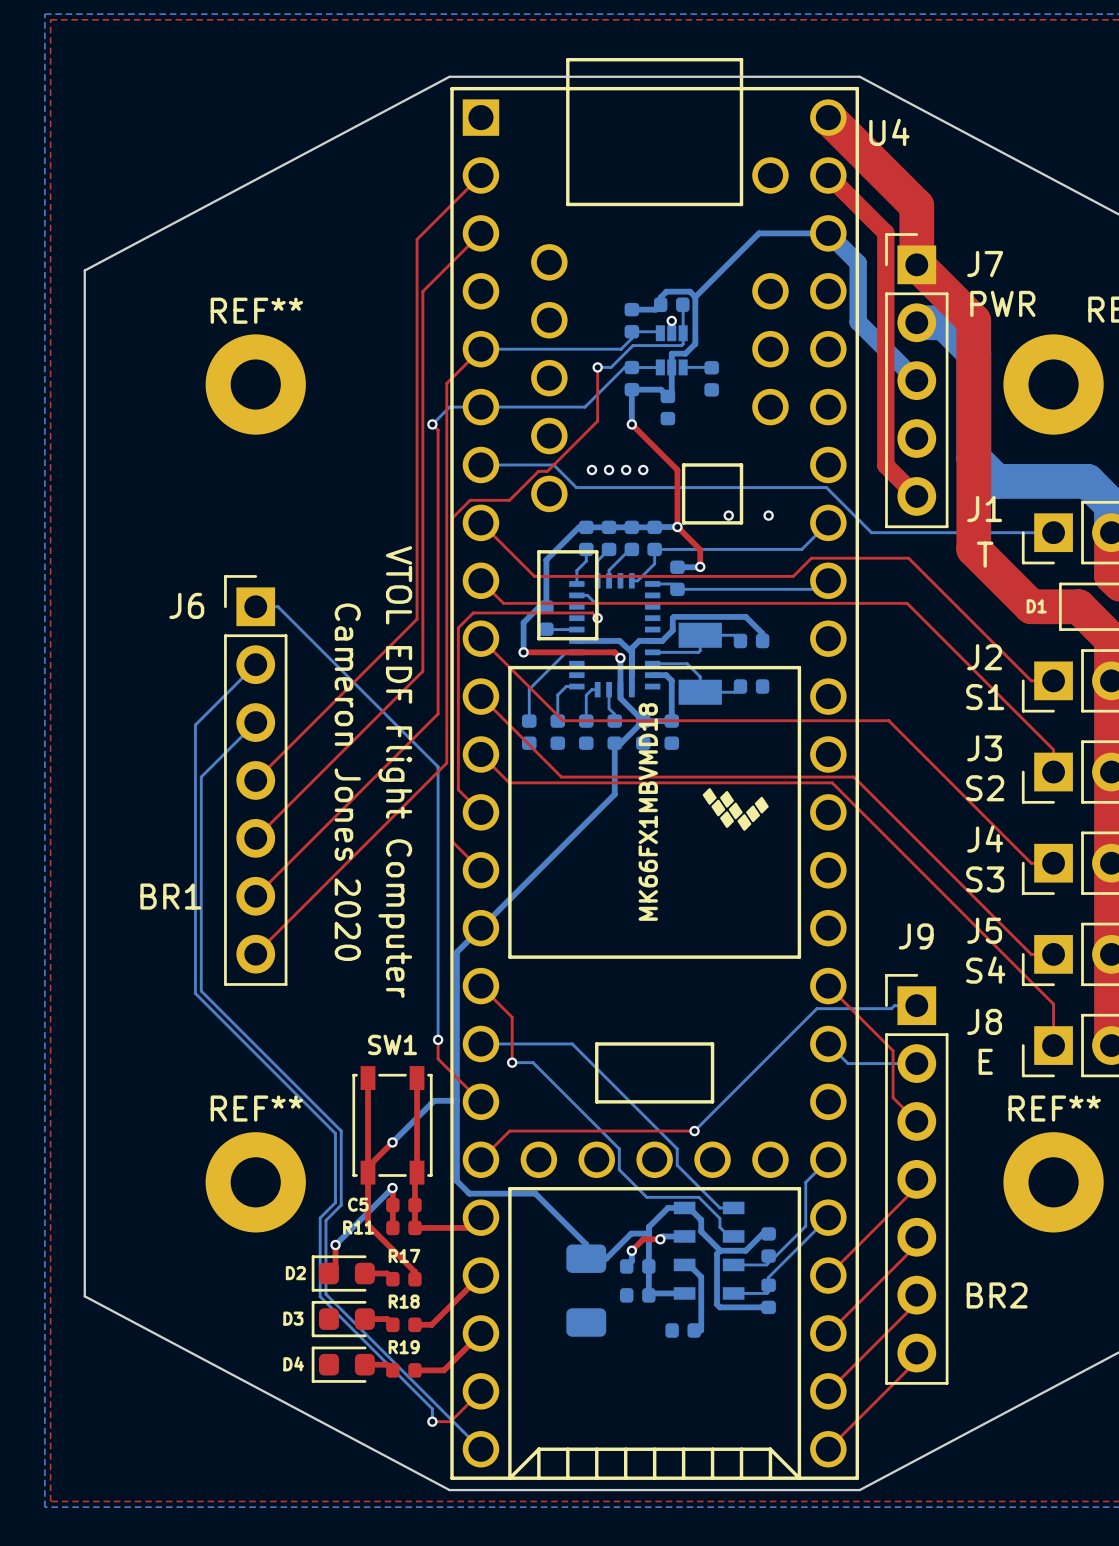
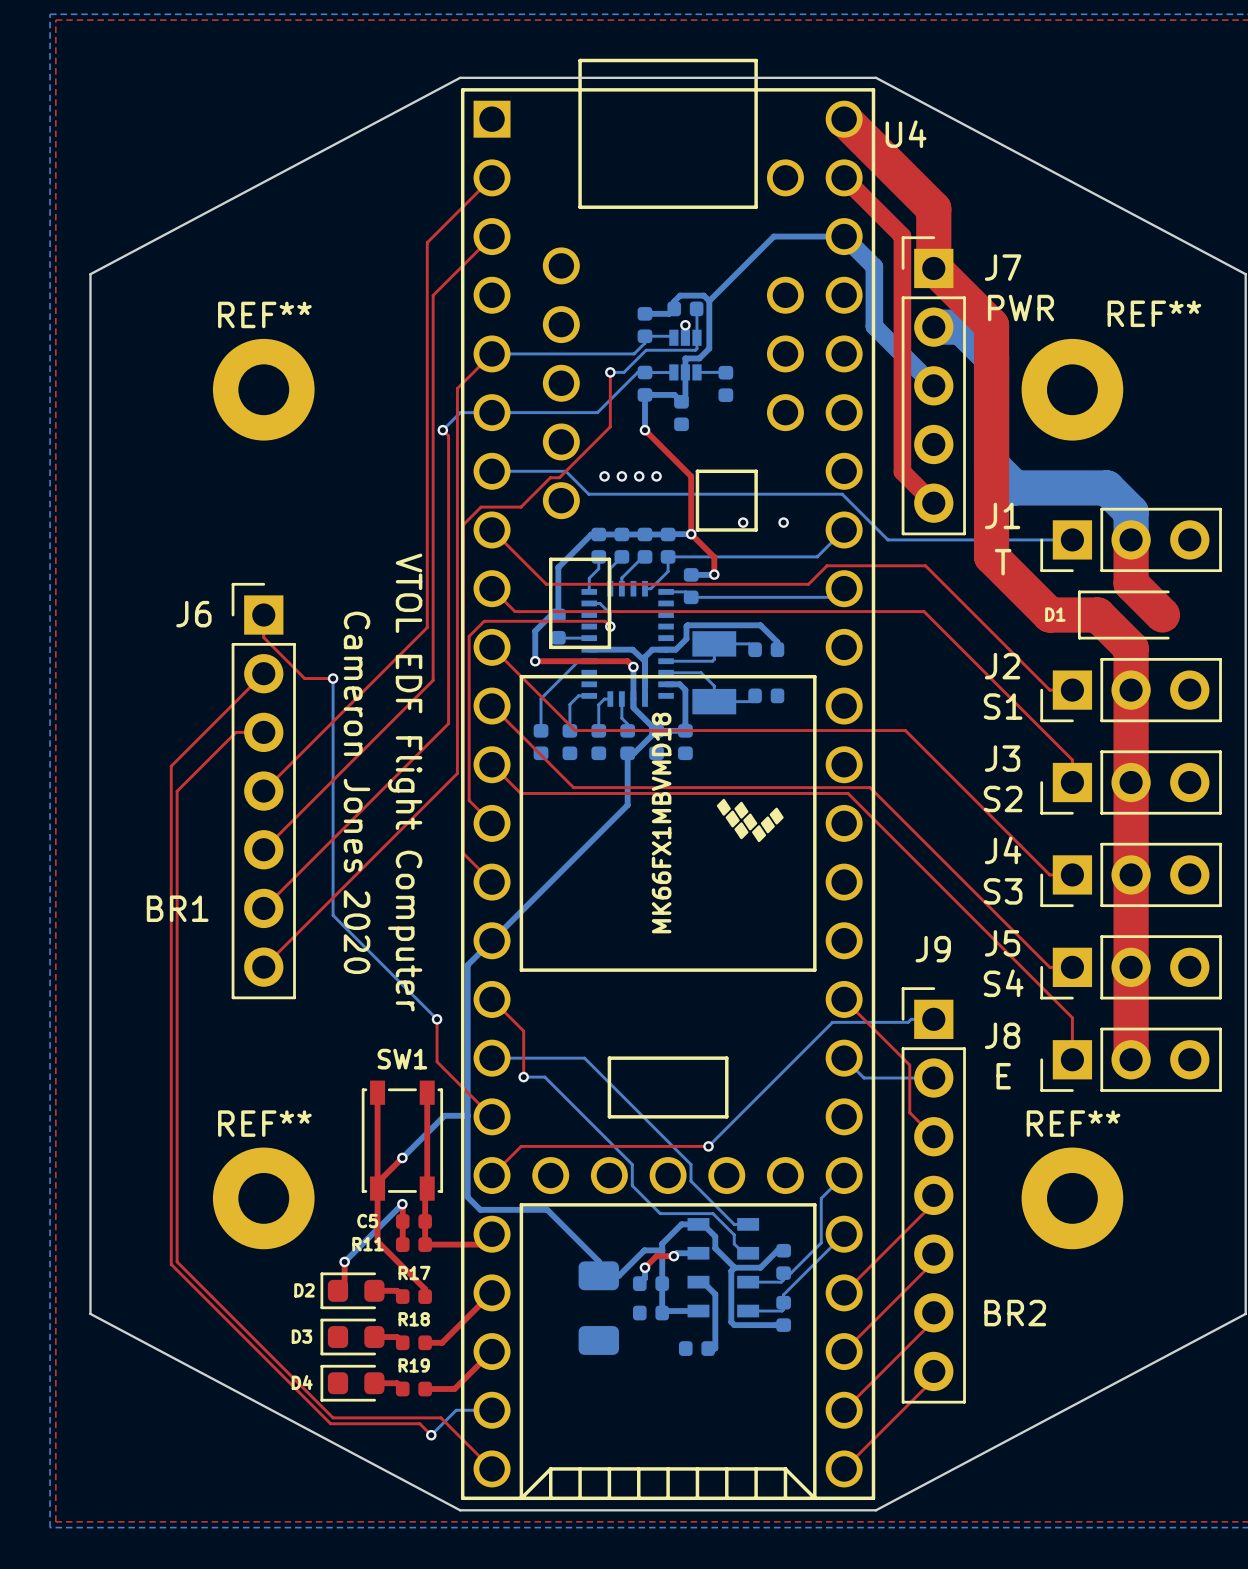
bottom track: (255, 606) (278, 606) (438, 766) (438, 1039) -> none
top track: none -> (263, 615) (263, 637) (304, 678) (333, 678)
bottom track: (255, 664) (195, 724) (195, 993) (335, 1133) (335, 1202) (320, 1217) (320, 1296) (432, 1408) (432, 1421) -> none
top track: none -> (263, 673) (171, 766) (171, 1264) (330, 1423) (419, 1423) (431, 1435)
bottom track: none -> (333, 678) (333, 915) (437, 1019)
via: none -> (333, 678)
bottom track: (255, 722) (201, 777) (201, 991) (341, 1131) (341, 1205) (325, 1220) (325, 1294) (480, 1449) -> none
top track: none -> (263, 732) (235, 732) (177, 791) (177, 1261) (211, 1296)
top track: (438, 1039) (438, 1059) -> (437, 1019) (437, 1061) (448, 1073)
via position: (438, 1039) -> (437, 1019)
top track: none -> (211, 1296) (333, 1417) (440, 1417) (492, 1468)
bottom track: none -> (492, 1410) (456, 1410) (431, 1435)
top track: (480, 1391) (450, 1421) (432, 1421) -> none
via position: (432, 1421) -> (431, 1435)

